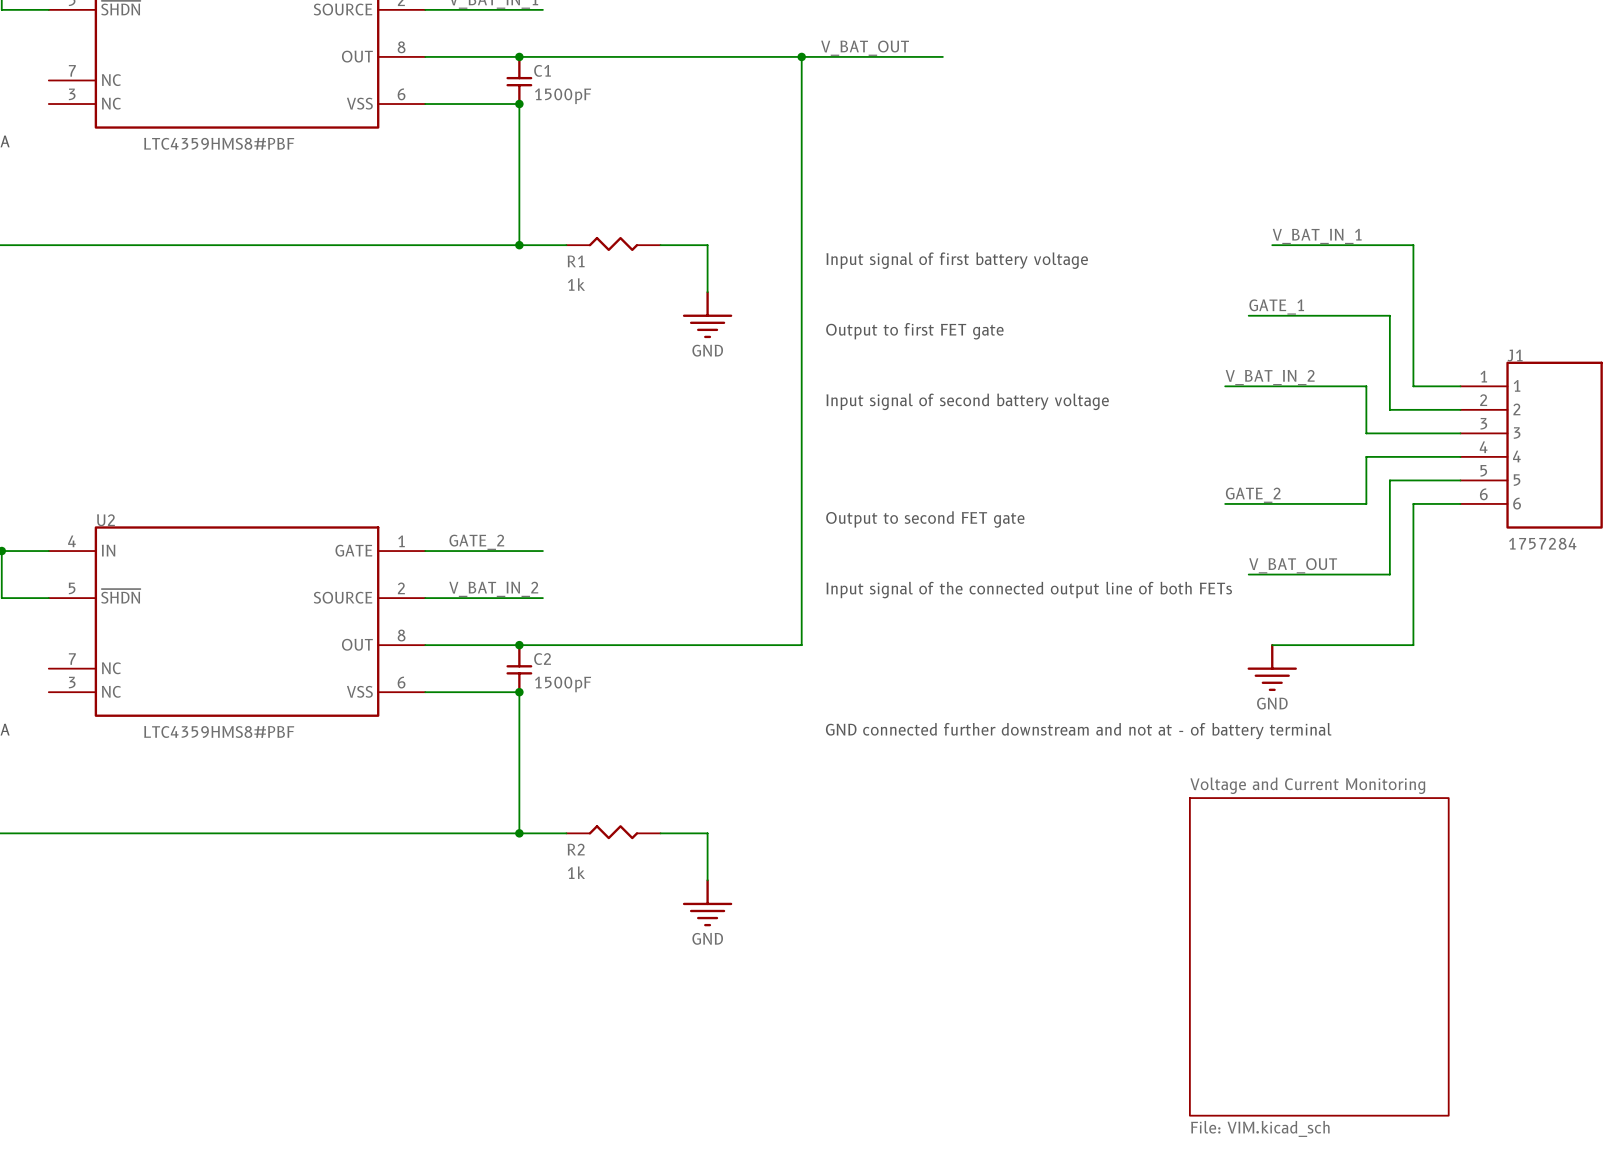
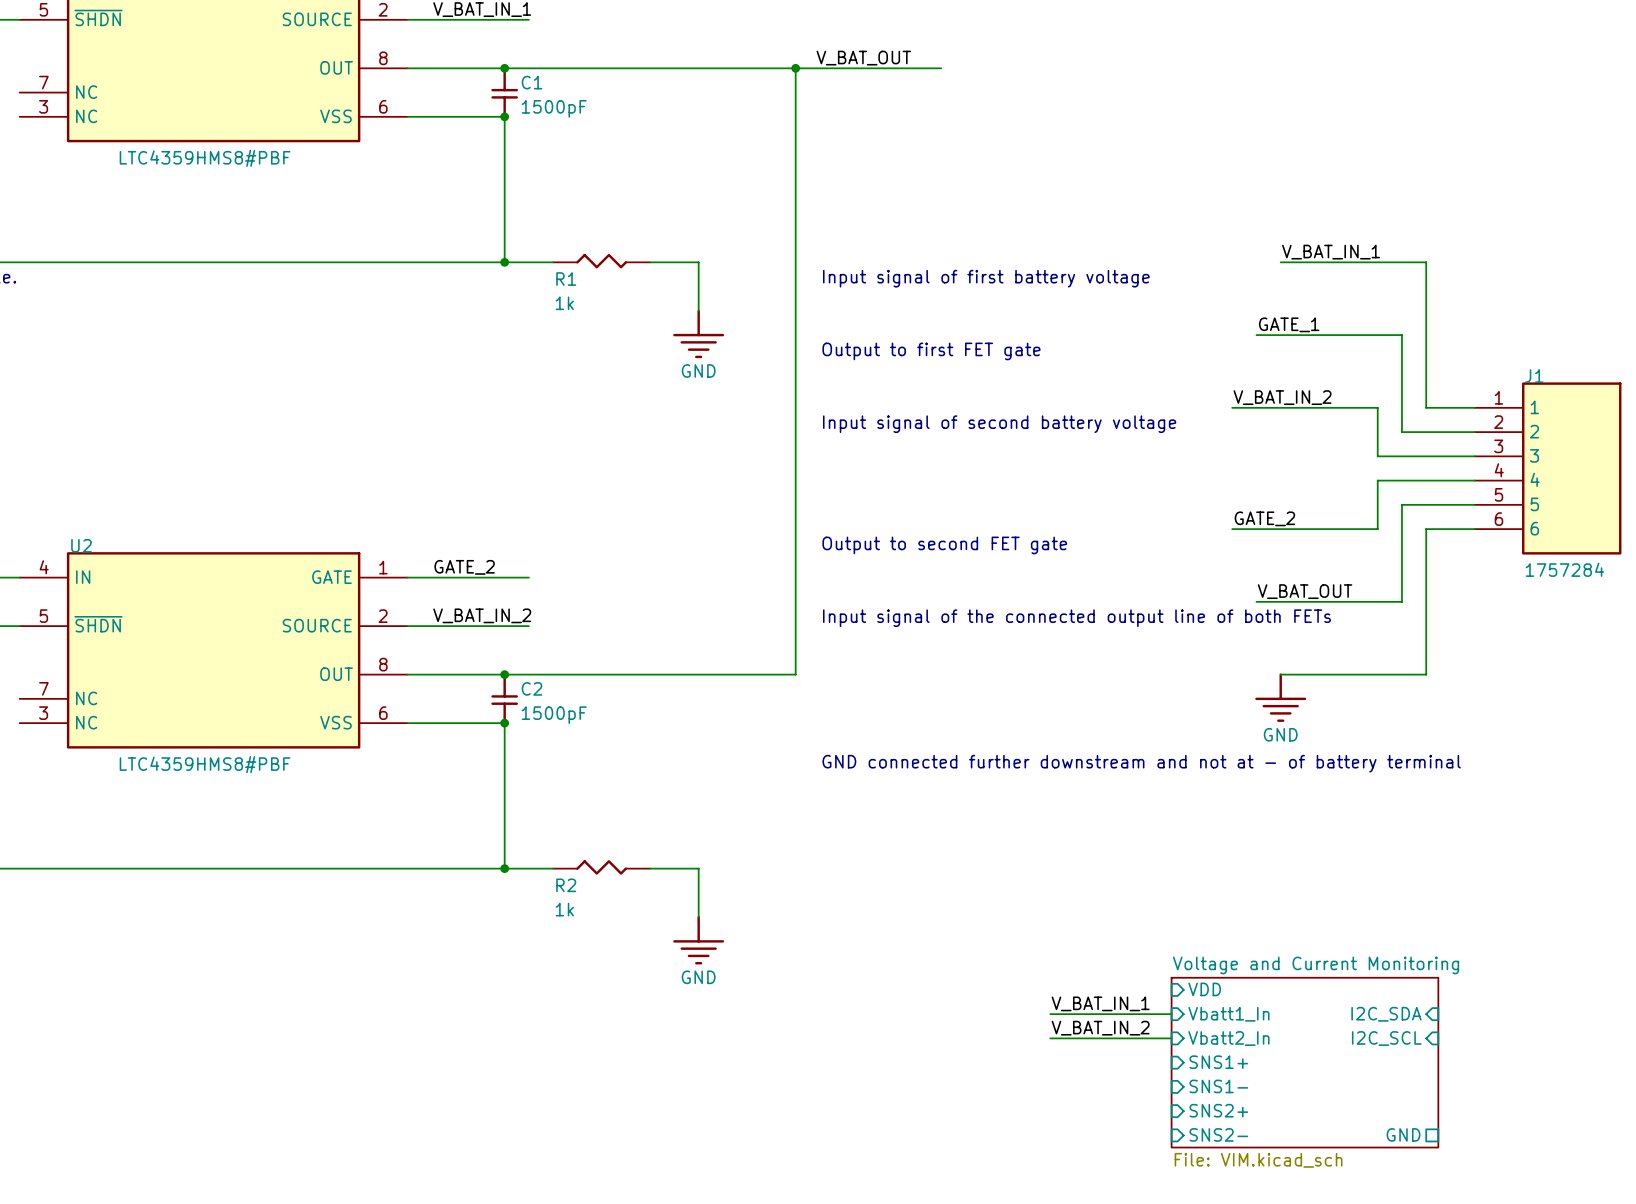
sheet pin: none -> VDD (1204, 989)
sheet Voltage and Current Monitoring: File: VIM.kicad_sch (1319, 956) -> none
label: none -> V_BAT_IN_1 (1100, 1003)
wire: none -> (1050, 1014) (1171, 1014)
sheet pin: none -> Vbatt1_In (1228, 1014)
sheet pin: none -> I2C_SDA (1386, 1014)
label: none -> V_BAT_IN_2 (1100, 1028)
wire: none -> (1050, 1038) (1171, 1038)
sheet pin: none -> Vbatt2_In (1228, 1038)
sheet pin: none -> I2C_SCL (1386, 1038)
sheet pin: none -> SNS1+ (1218, 1062)
sheet Voltage and Current Monitoring: none -> File: VIM.kicad_sch (1304, 1062)
sheet pin: none -> SNS1- (1218, 1086)
sheet pin: none -> SNS2+ (1218, 1110)
sheet pin: none -> SNS2- (1218, 1134)
sheet pin: none -> GND (1403, 1134)

